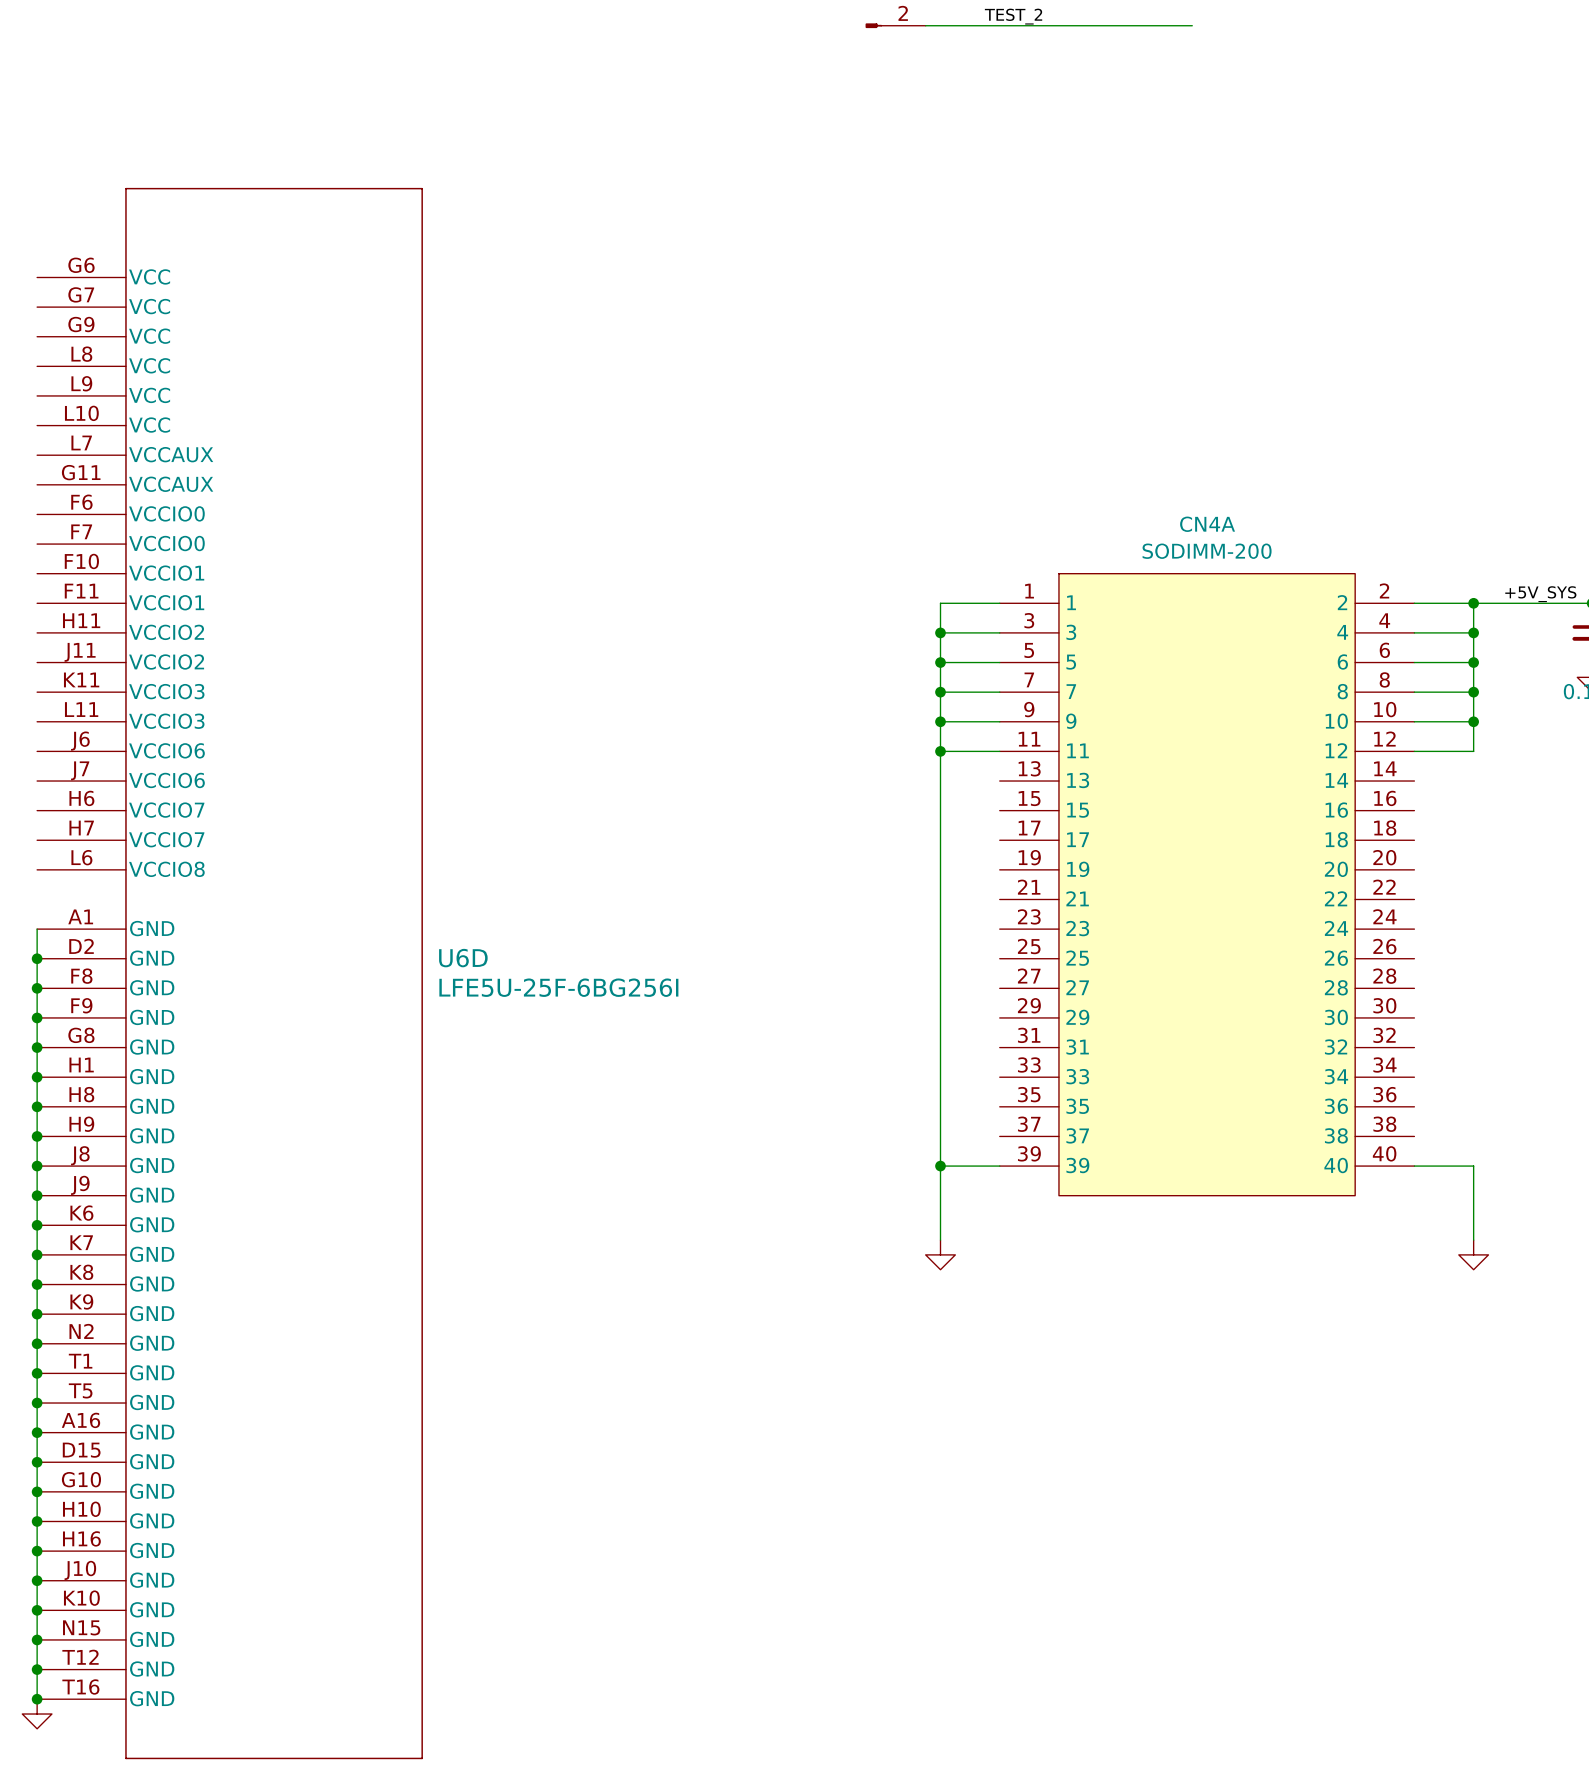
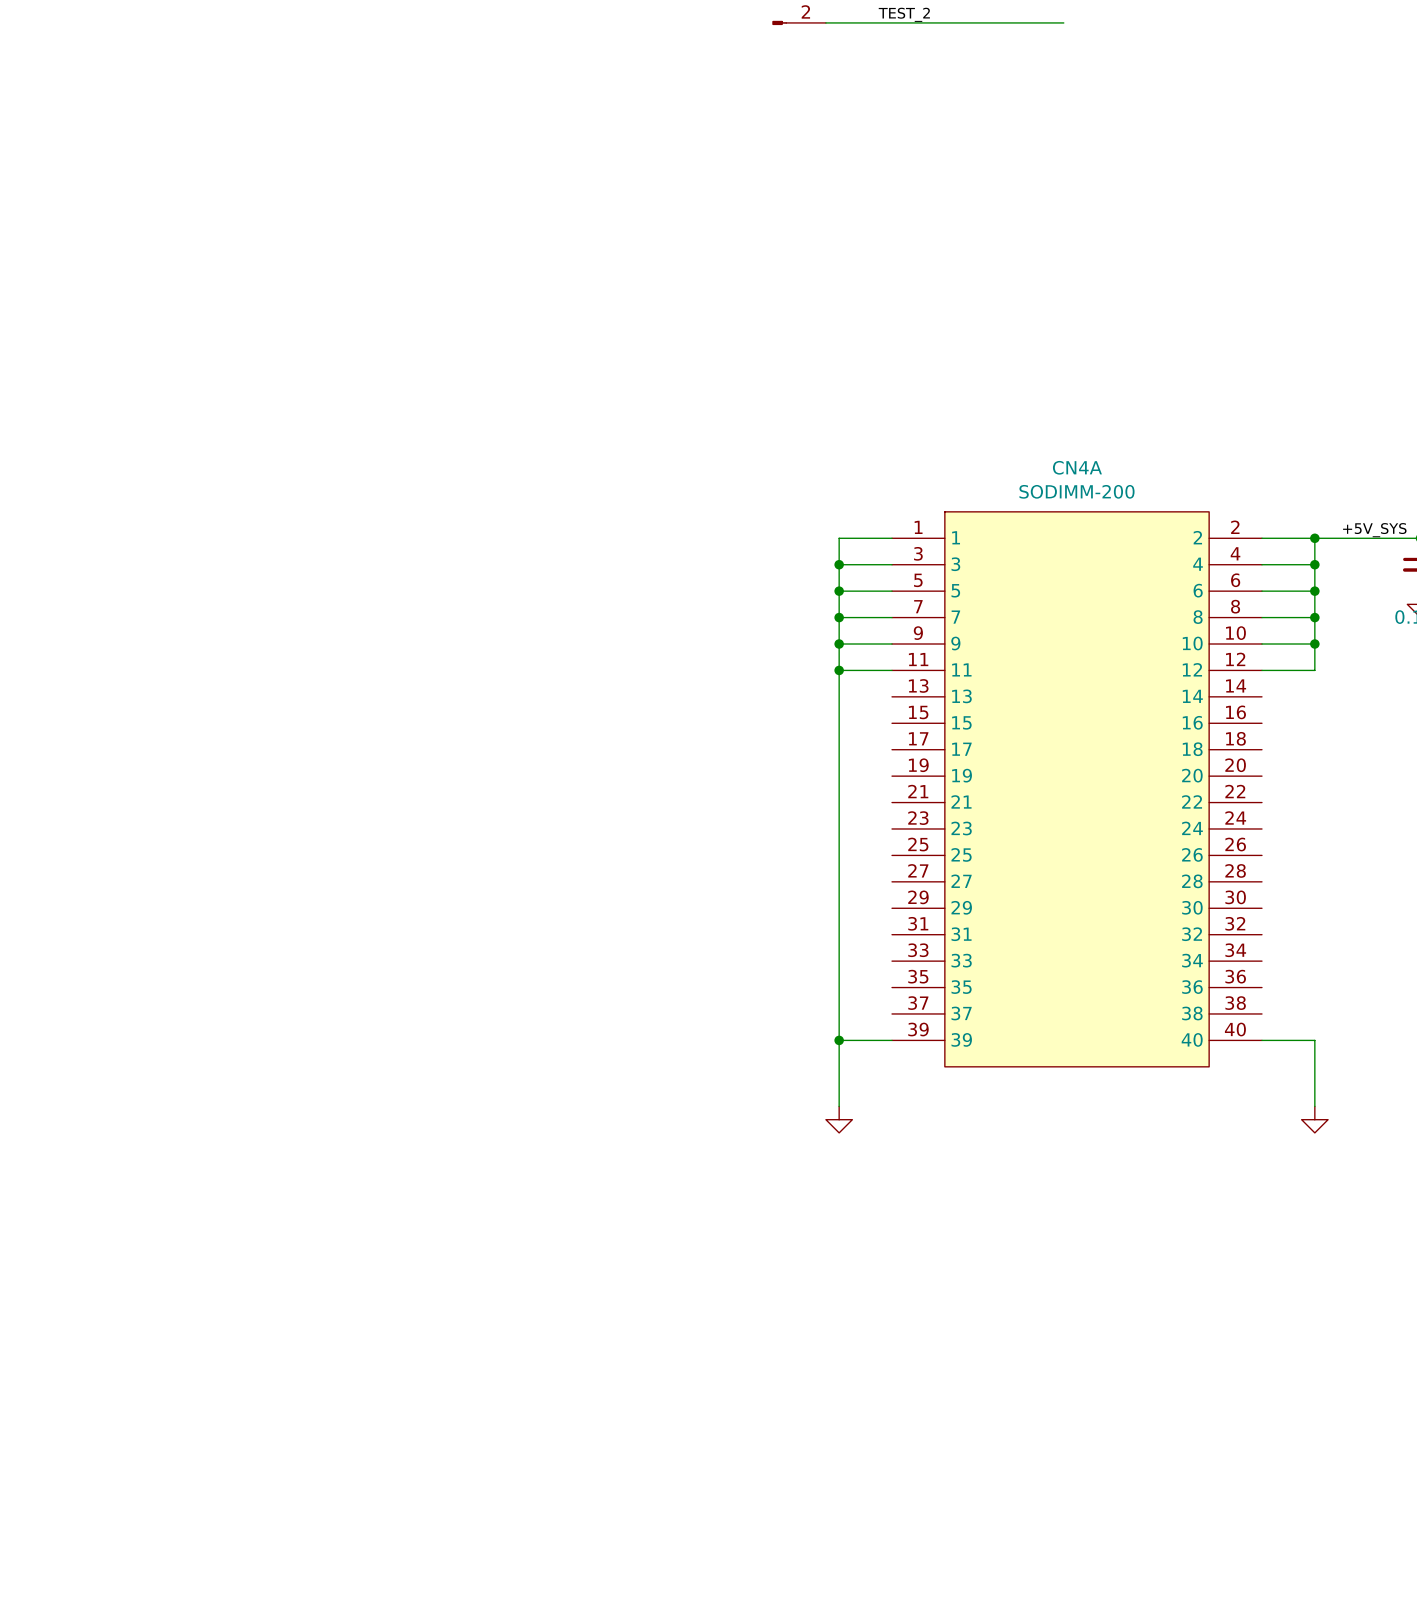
wire: (37, 929) (37, 1699) -> none
junction: (37, 958) -> none
U6D: LFE5U-25F-6BG256I (230, 973) -> none
junction: (37, 988) -> none
junction: (37, 1017) -> none
junction: (37, 1047) -> none
junction: (37, 1077) -> none
junction: (37, 1106) -> none
junction: (37, 1136) -> none
junction: (37, 1166) -> none
junction: (37, 1195) -> none
junction: (37, 1225) -> none
junction: (37, 1254) -> none
junction: (37, 1284) -> none
junction: (37, 1314) -> none
junction: (37, 1343) -> none
junction: (37, 1373) -> none
junction: (37, 1403) -> none
junction: (37, 1432) -> none
junction: (37, 1462) -> none
junction: (37, 1491) -> none
junction: (37, 1521) -> none
junction: (37, 1551) -> none
junction: (37, 1580) -> none
junction: (37, 1610) -> none
junction: (37, 1639) -> none
junction: (37, 1669) -> none
junction: (37, 1699) -> none
power symbol: (37, 1714) -> none

